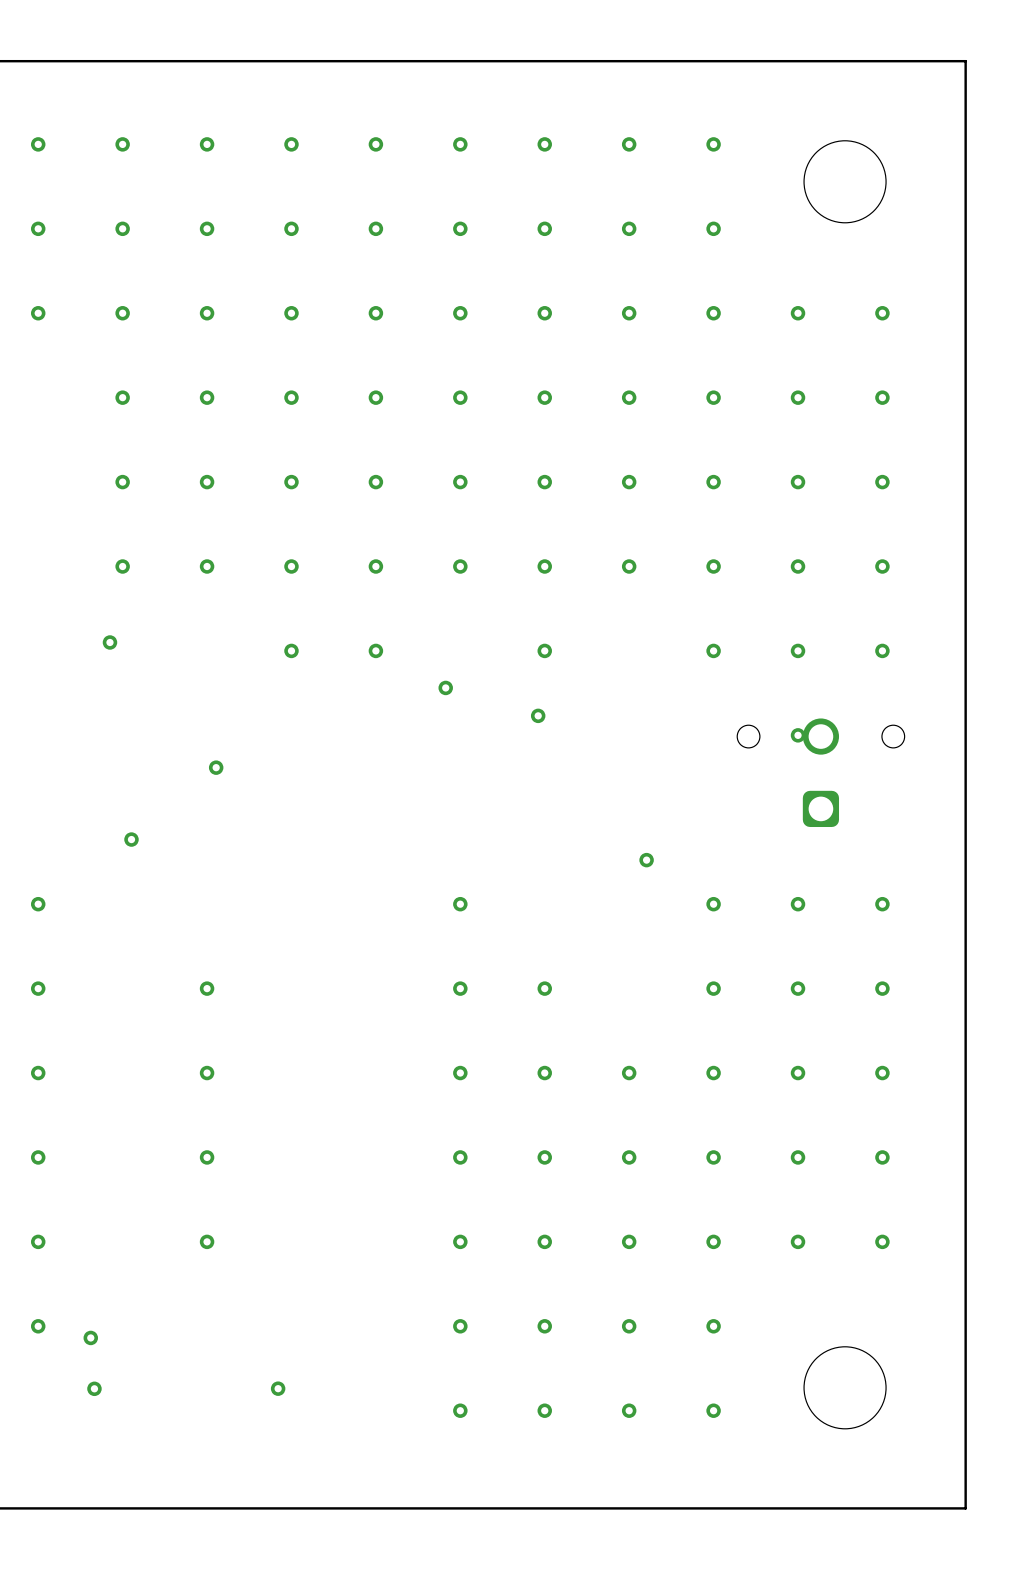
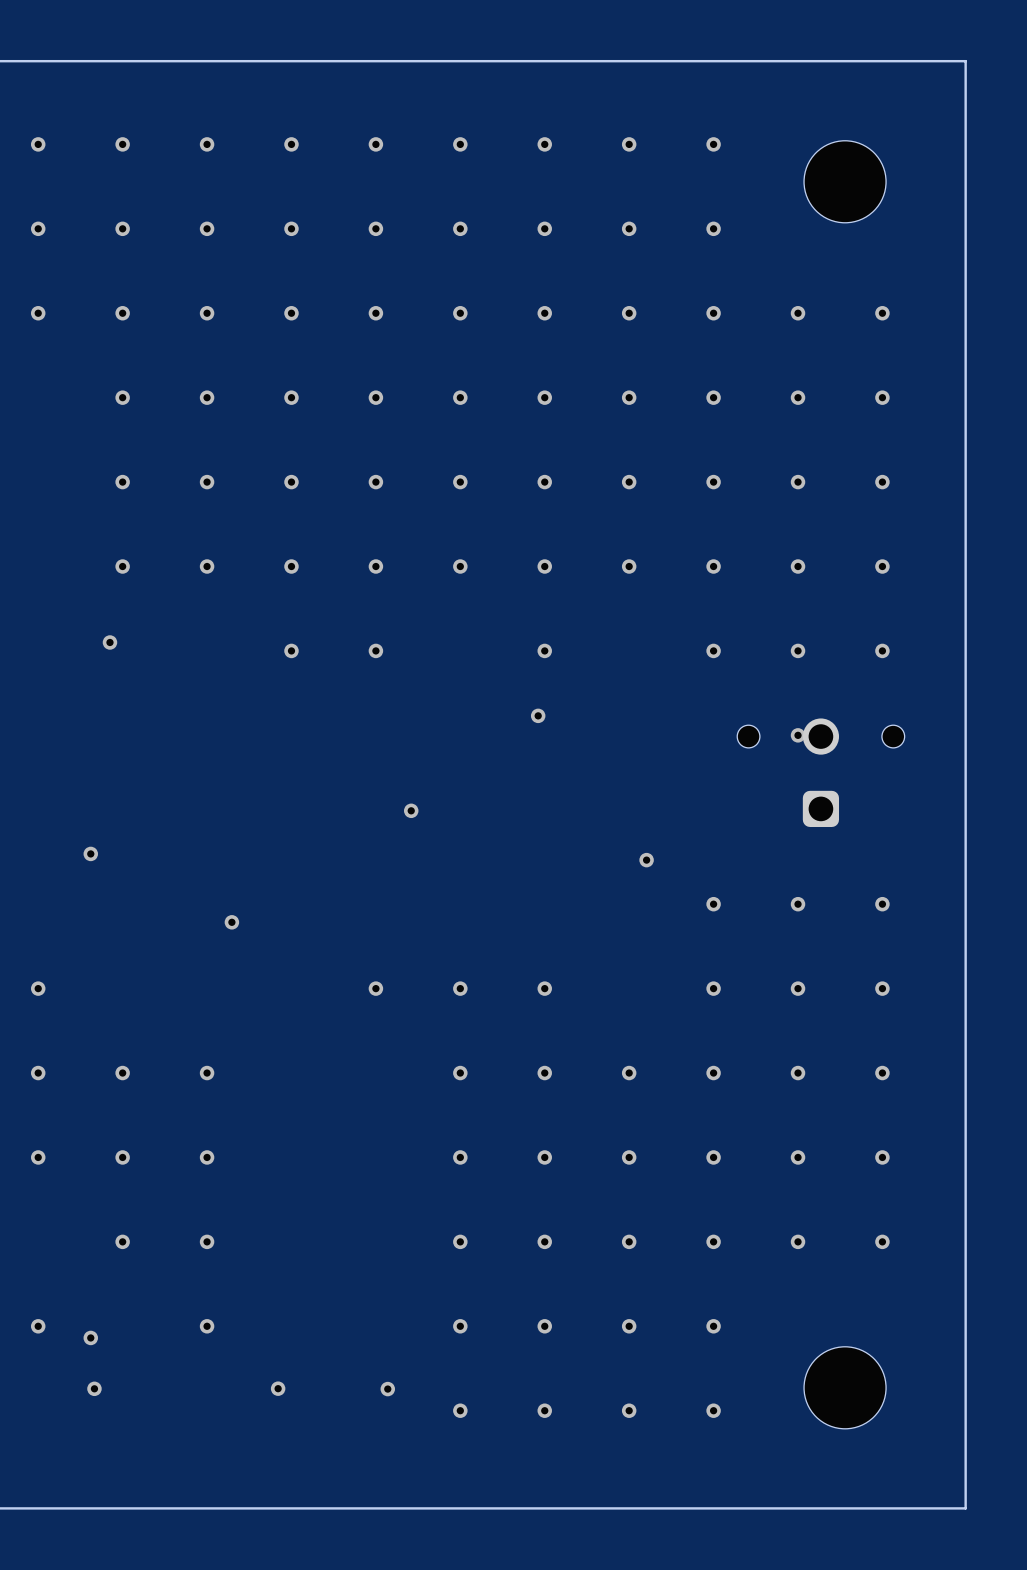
via: (445, 687) -> none
via: (216, 767) -> none
via: none -> (411, 810)
via: (131, 839) -> none
via: none -> (90, 853)
via: (38, 904) -> none
via: (460, 904) -> none
via: none -> (231, 922)
via: (207, 988) -> none
via: none -> (375, 988)
via: none -> (122, 1073)
via: none -> (122, 1157)
via: (38, 1241) -> none
via: none -> (122, 1241)
via: none -> (207, 1326)
via: none -> (387, 1389)

